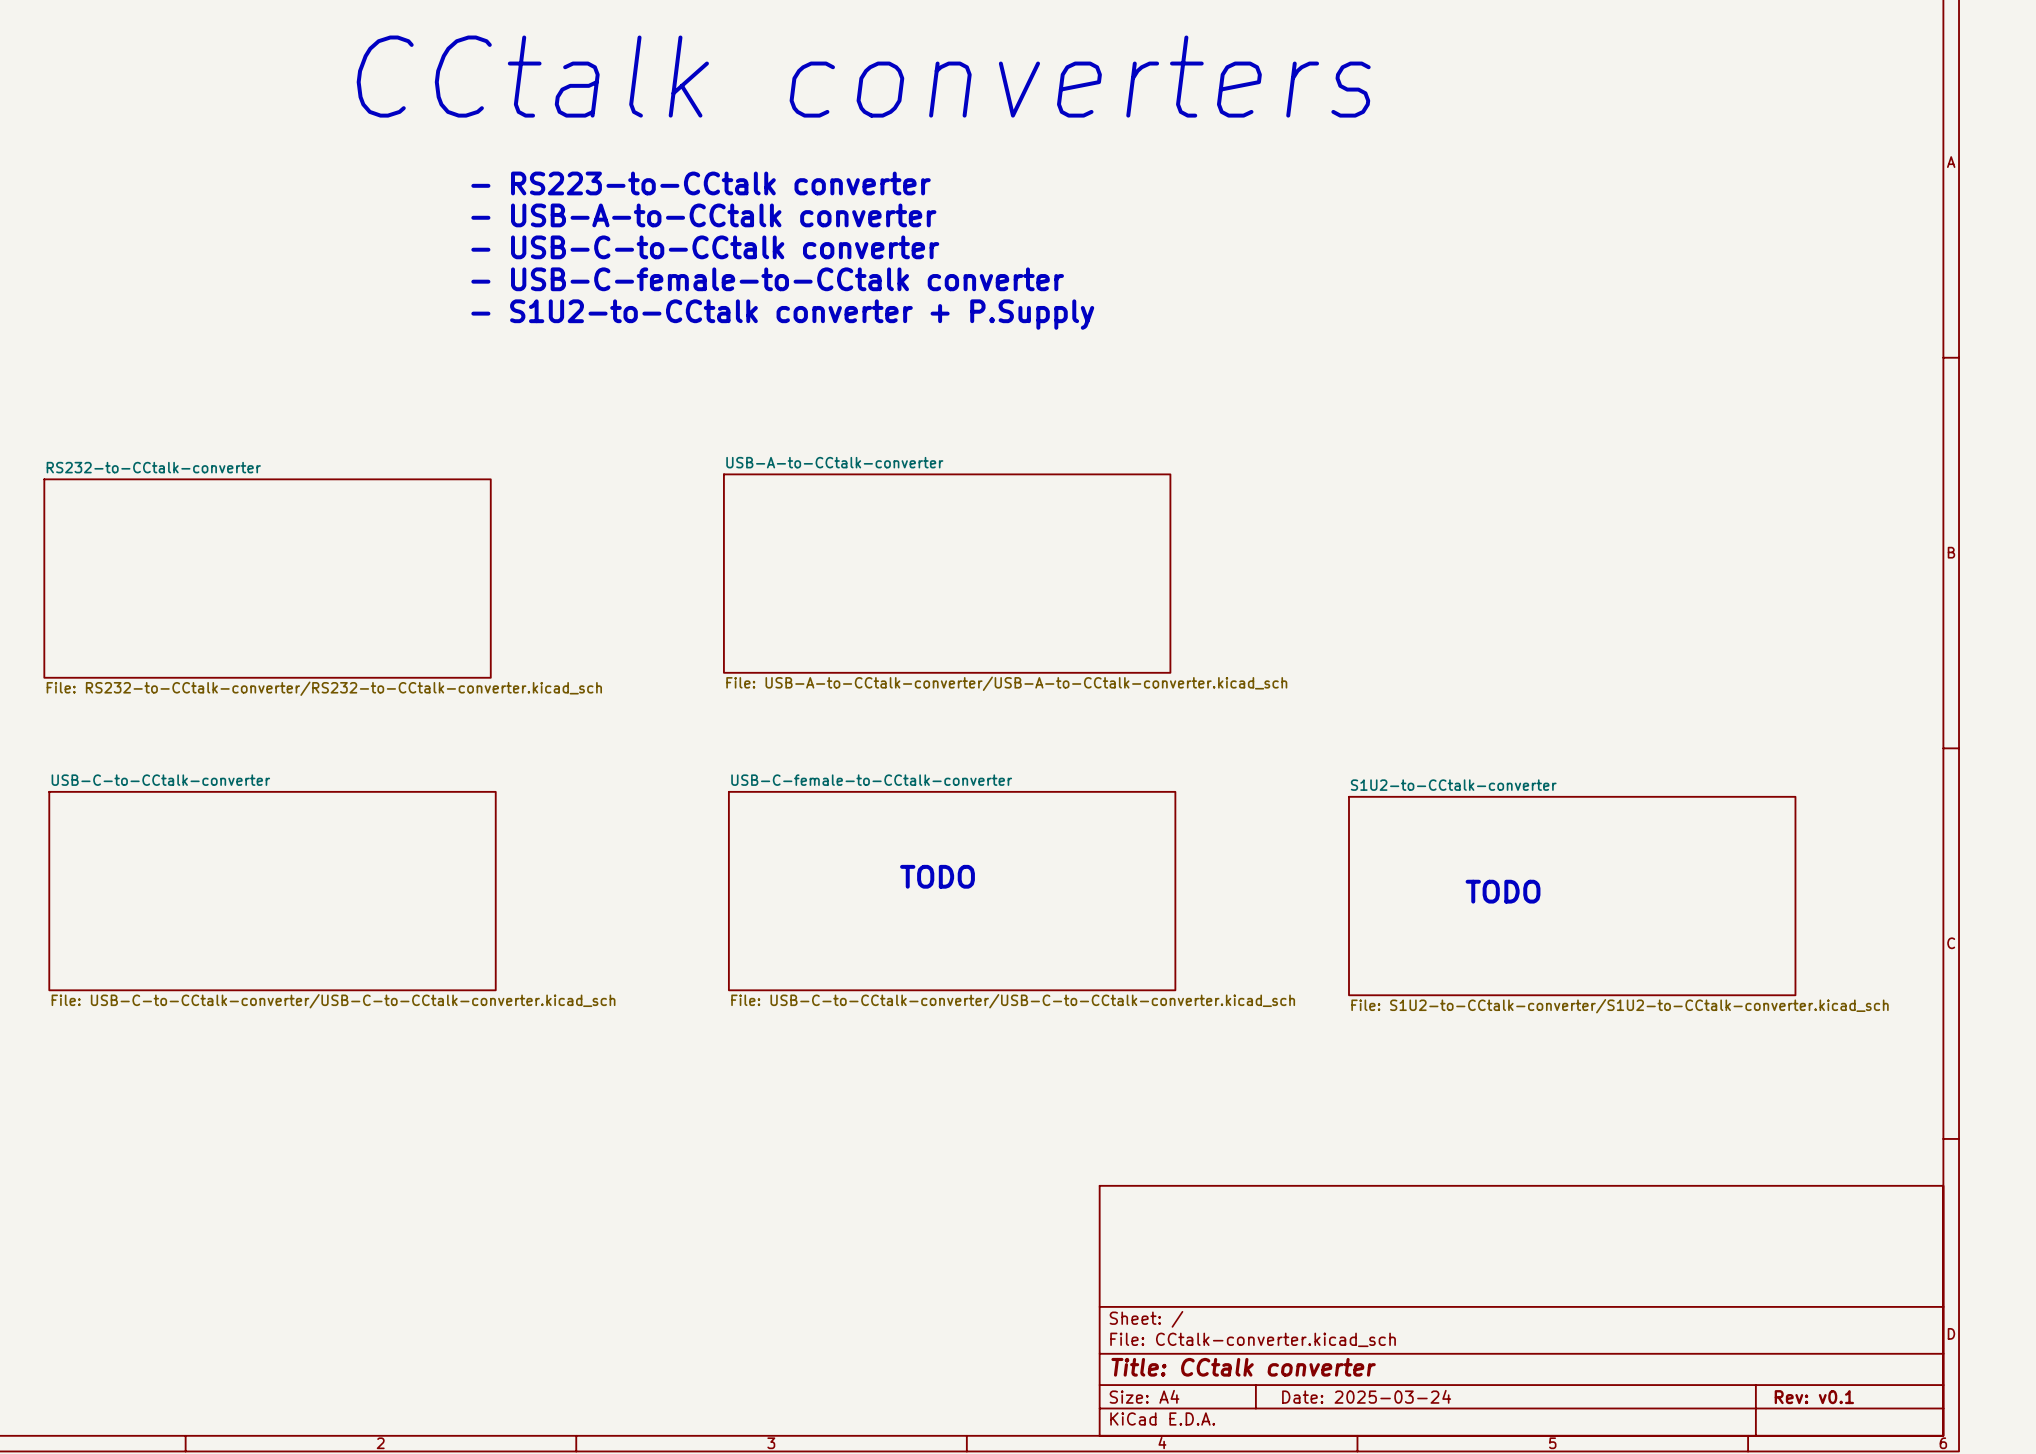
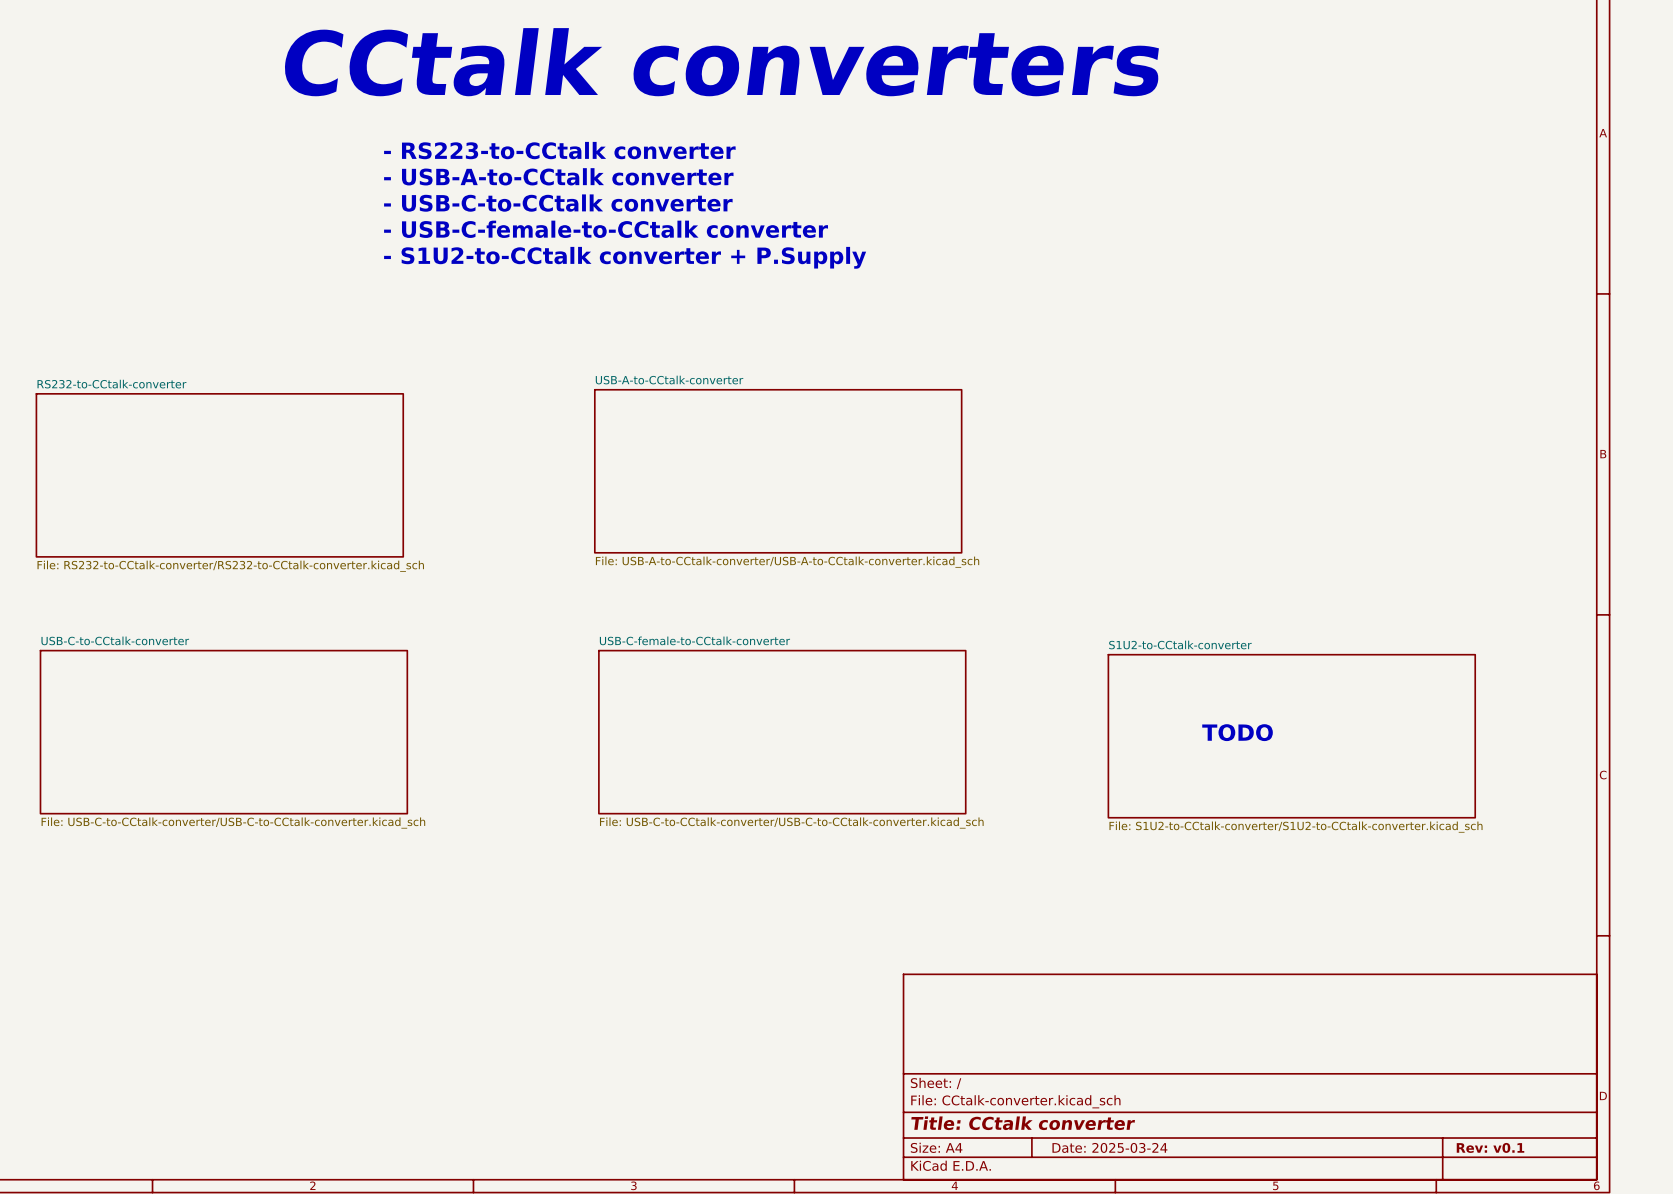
text: TODO (937, 876) -> none

